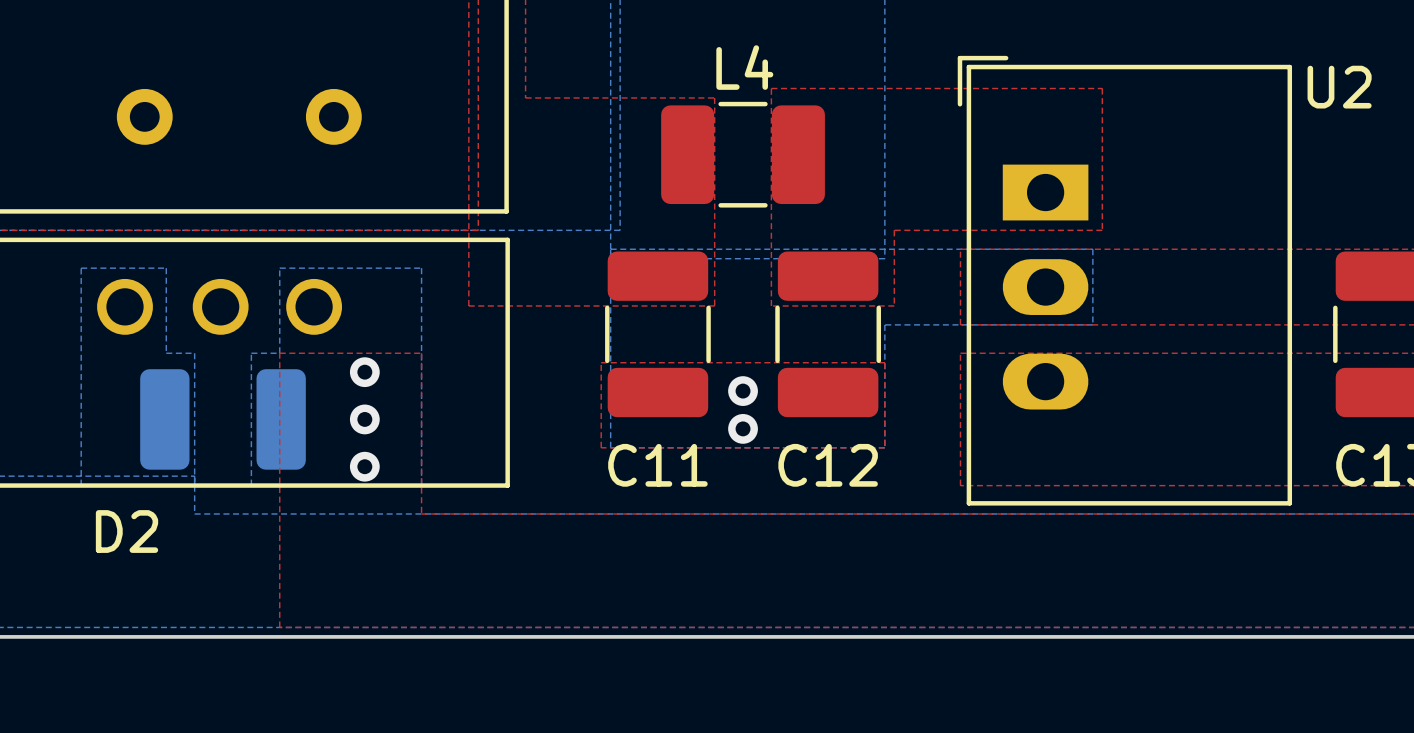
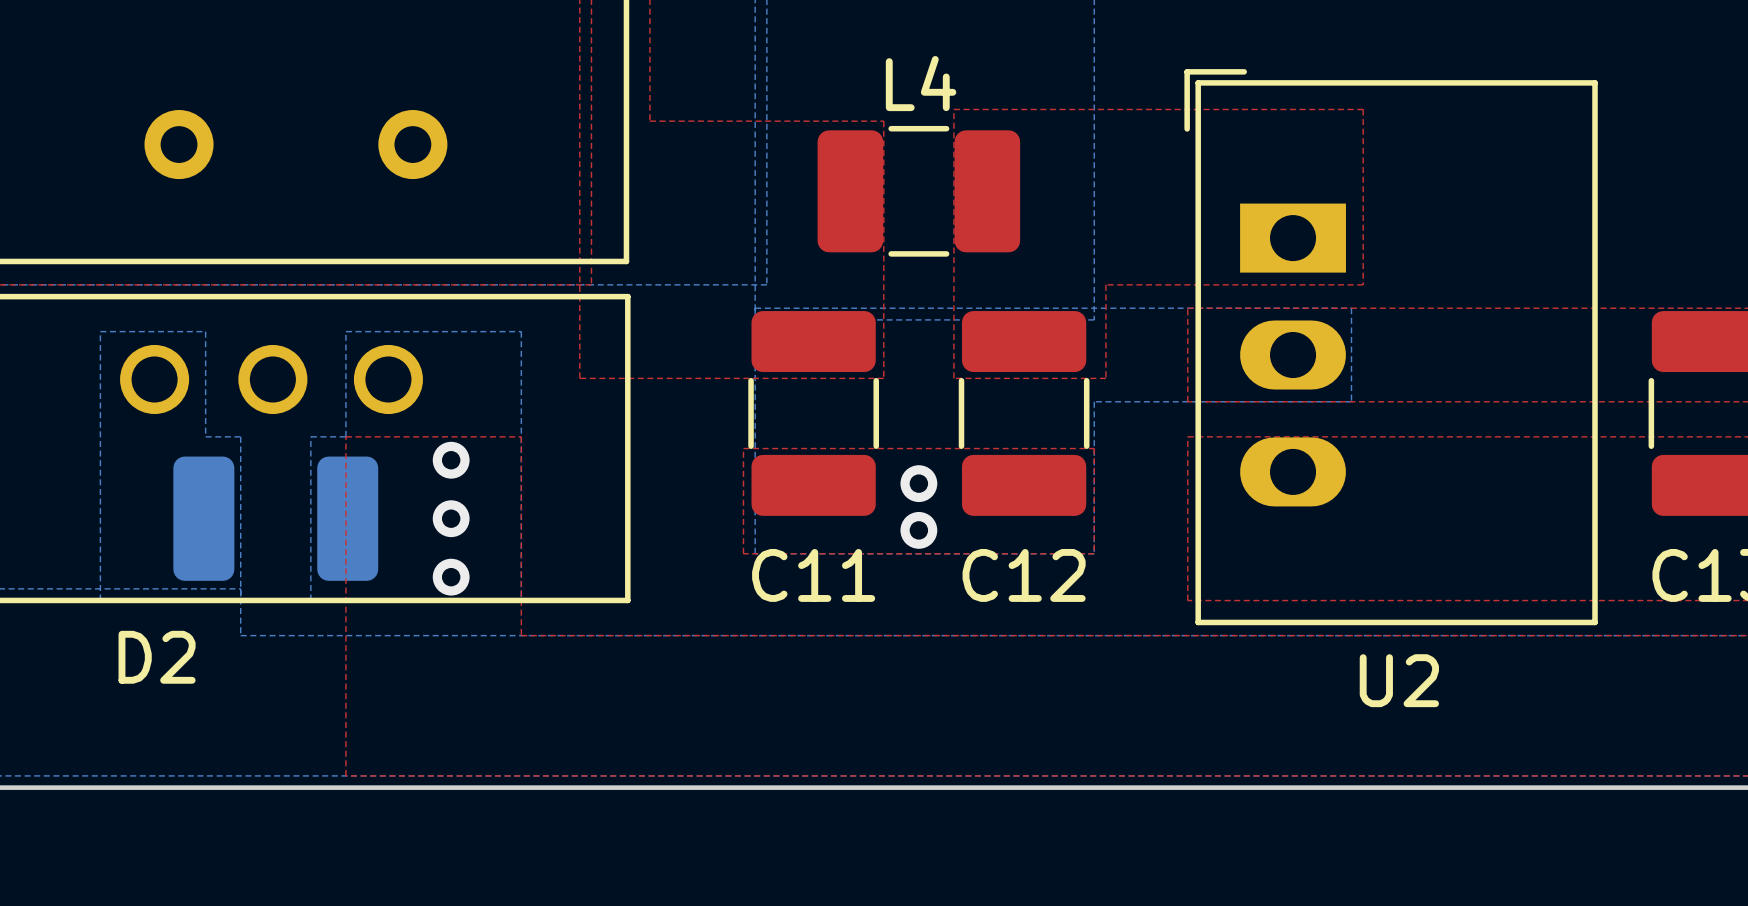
U2 name position: U2 (1339, 87) -> U2 (1399, 680)

